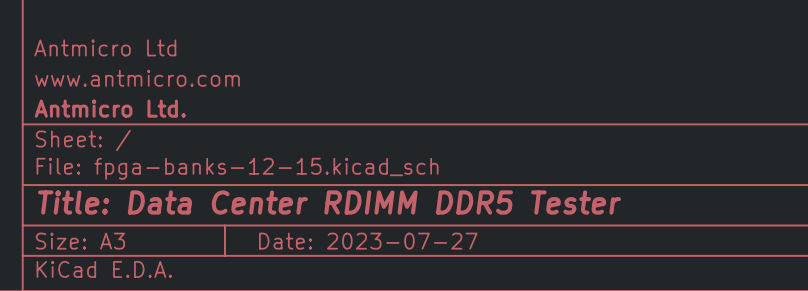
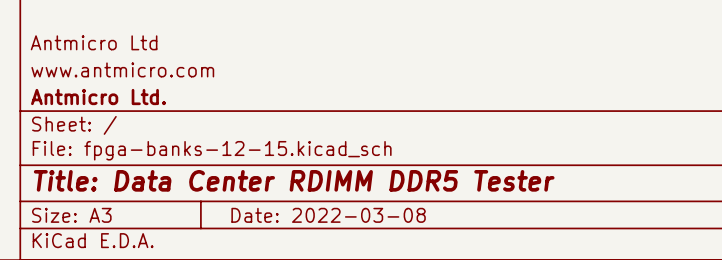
title block: Date: 2023-07-27 (368, 241) -> Date: 2022-03-08 (328, 215)

